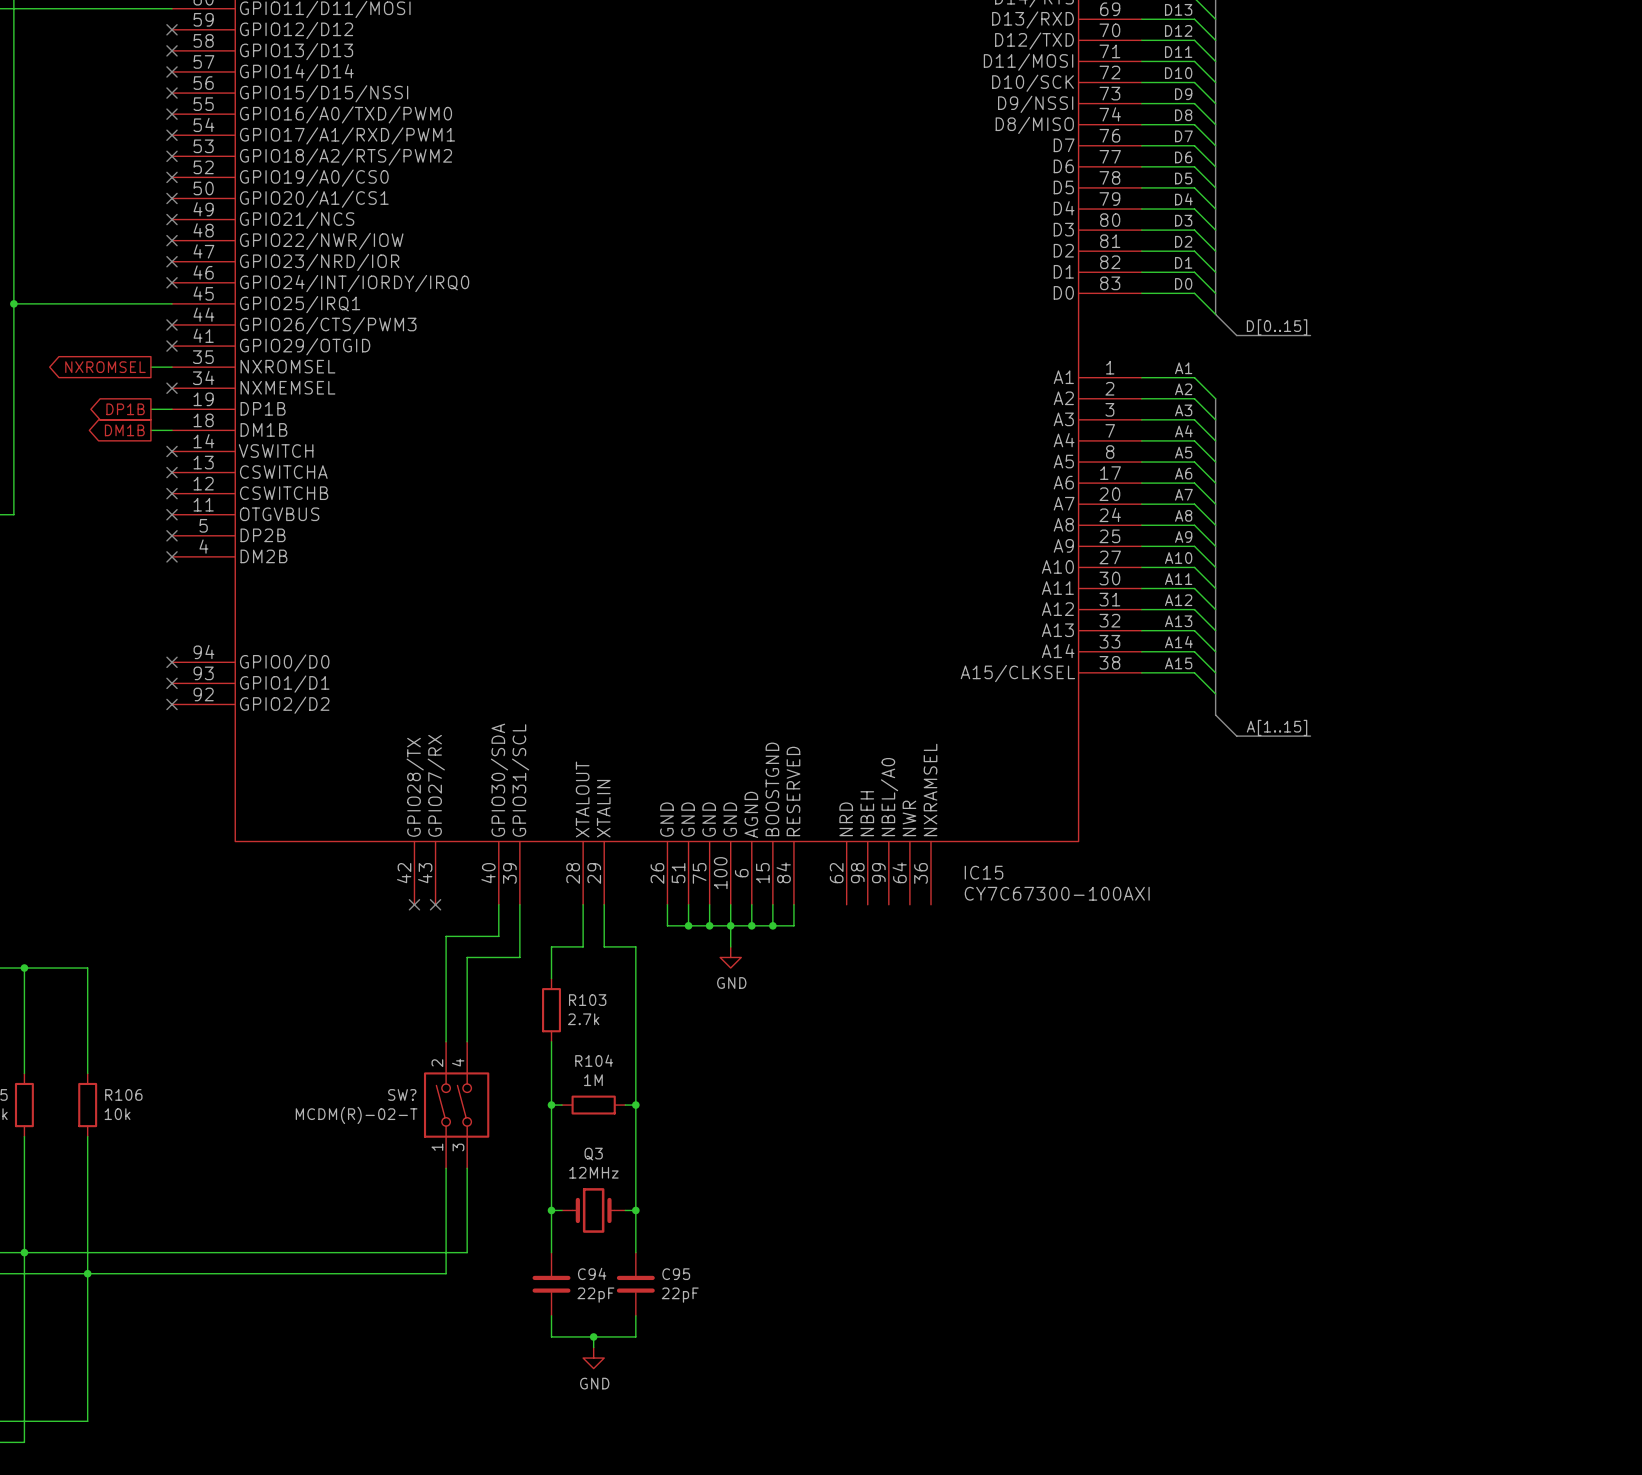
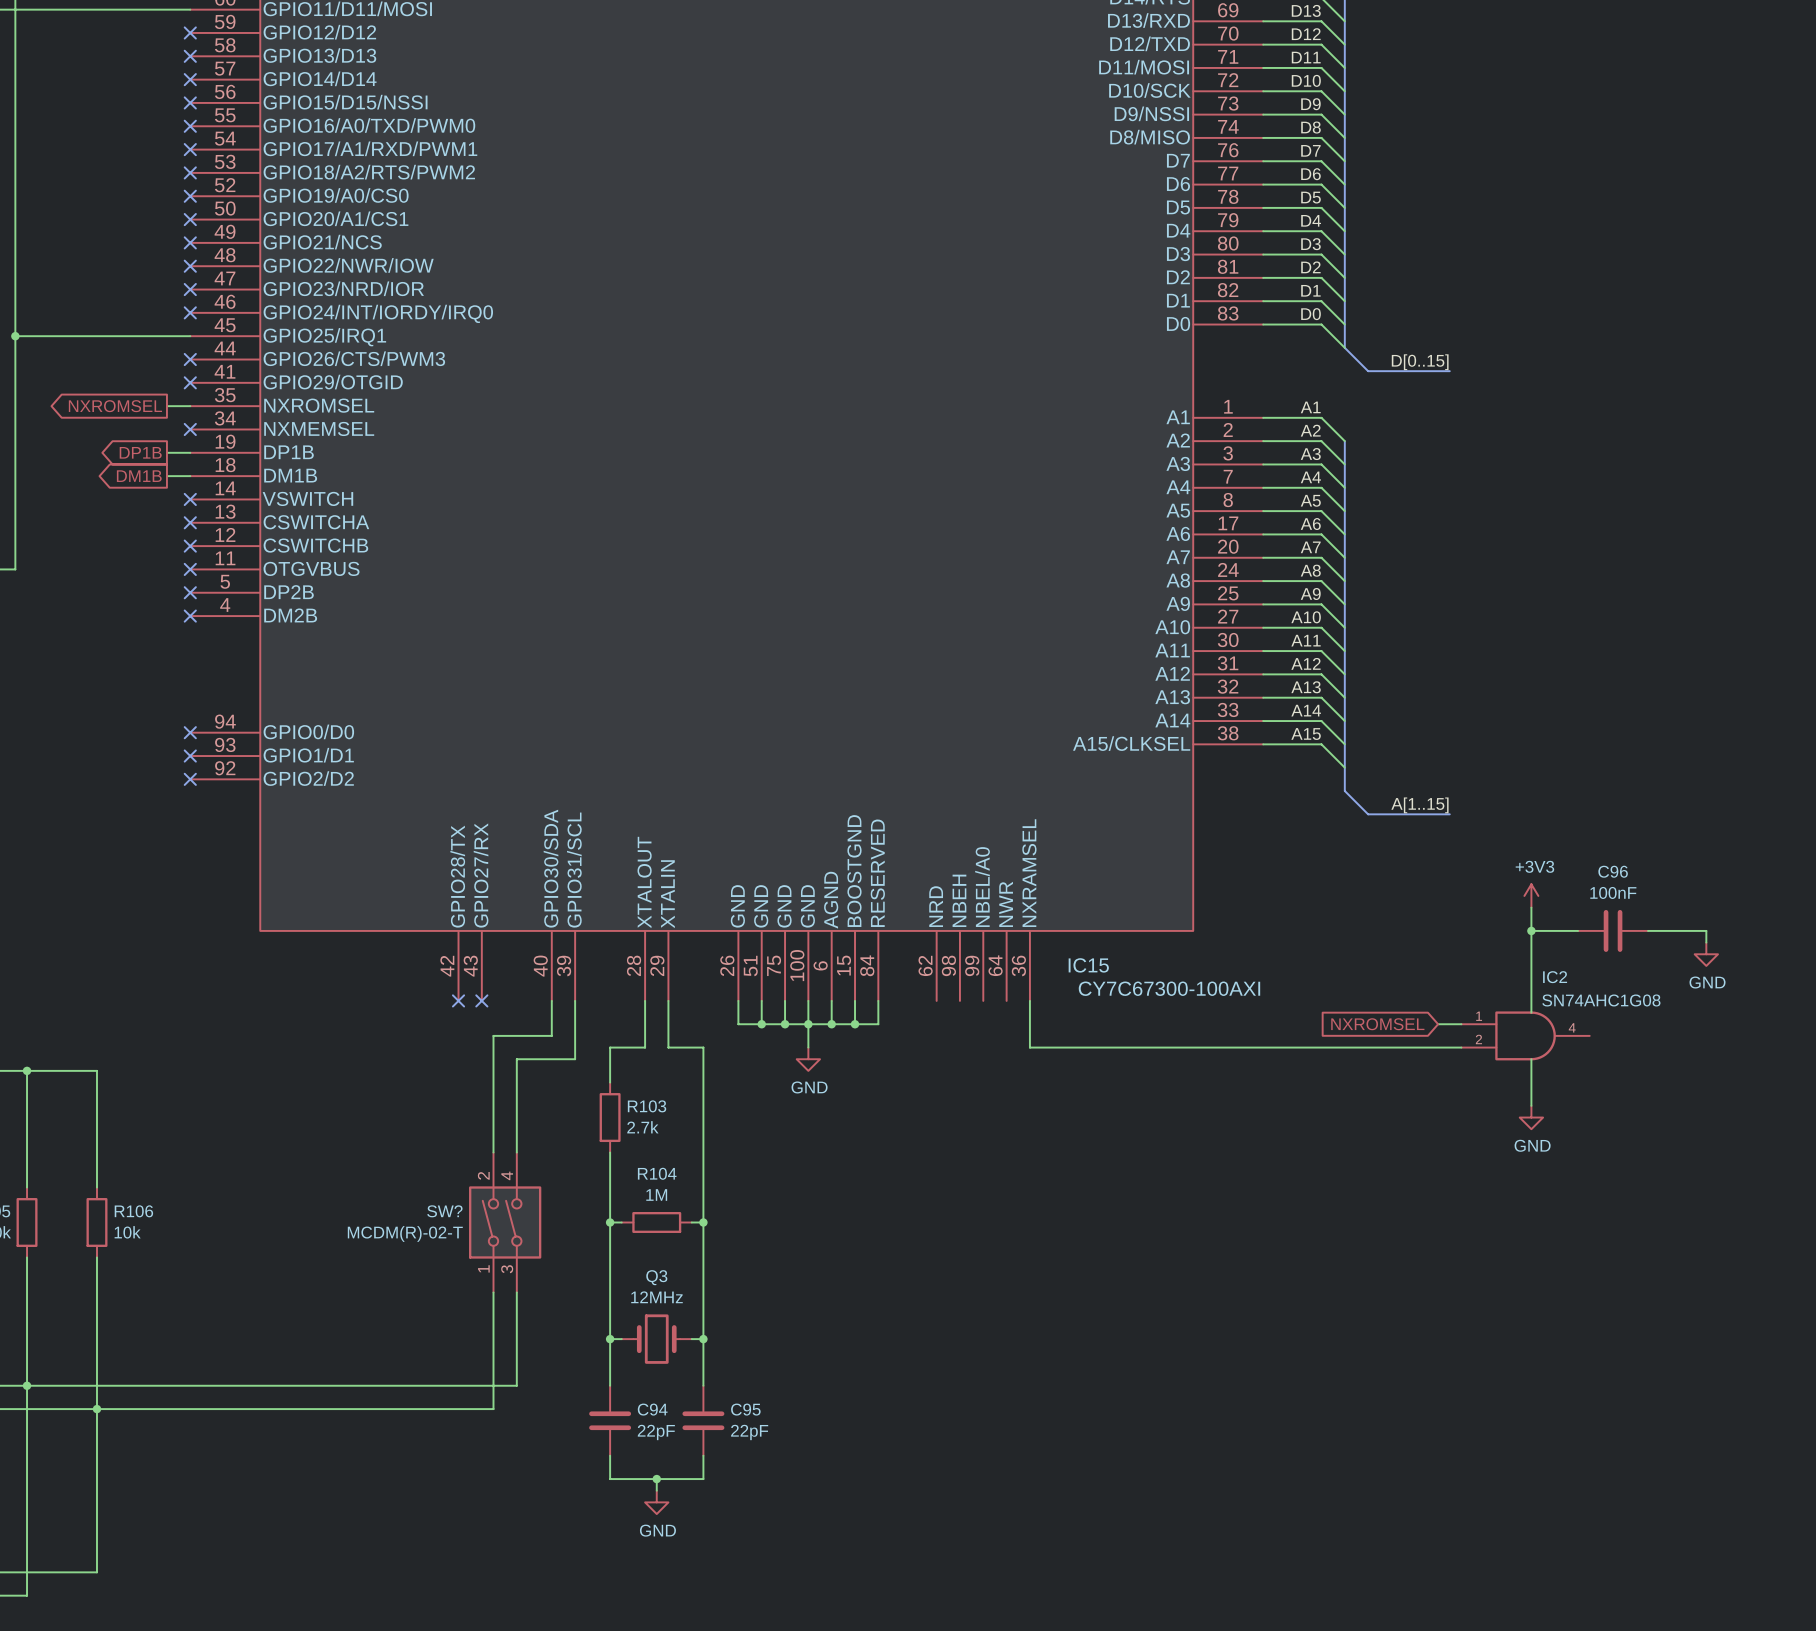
power symbol: none -> +3V3 (1531, 895)
wire: none -> (1531, 907) (1531, 1012)
wire: none -> (1531, 930) (1578, 930)
junction: none -> (1531, 930)
C96: none -> 100nF (1613, 930)
wire: none -> (1648, 930) (1706, 930) (1706, 942)
power symbol: none -> GND (1706, 954)
wire: none -> (1029, 1000) (1029, 1047) (1461, 1047)
global label: none -> NXROMSEL (1377, 1024)
wire: none -> (1438, 1024) (1461, 1024)
IC2: none -> SN74AHC1G08 (1525, 1035)
wire: none -> (1531, 1059) (1531, 1105)
power symbol: none -> GND (1531, 1117)

